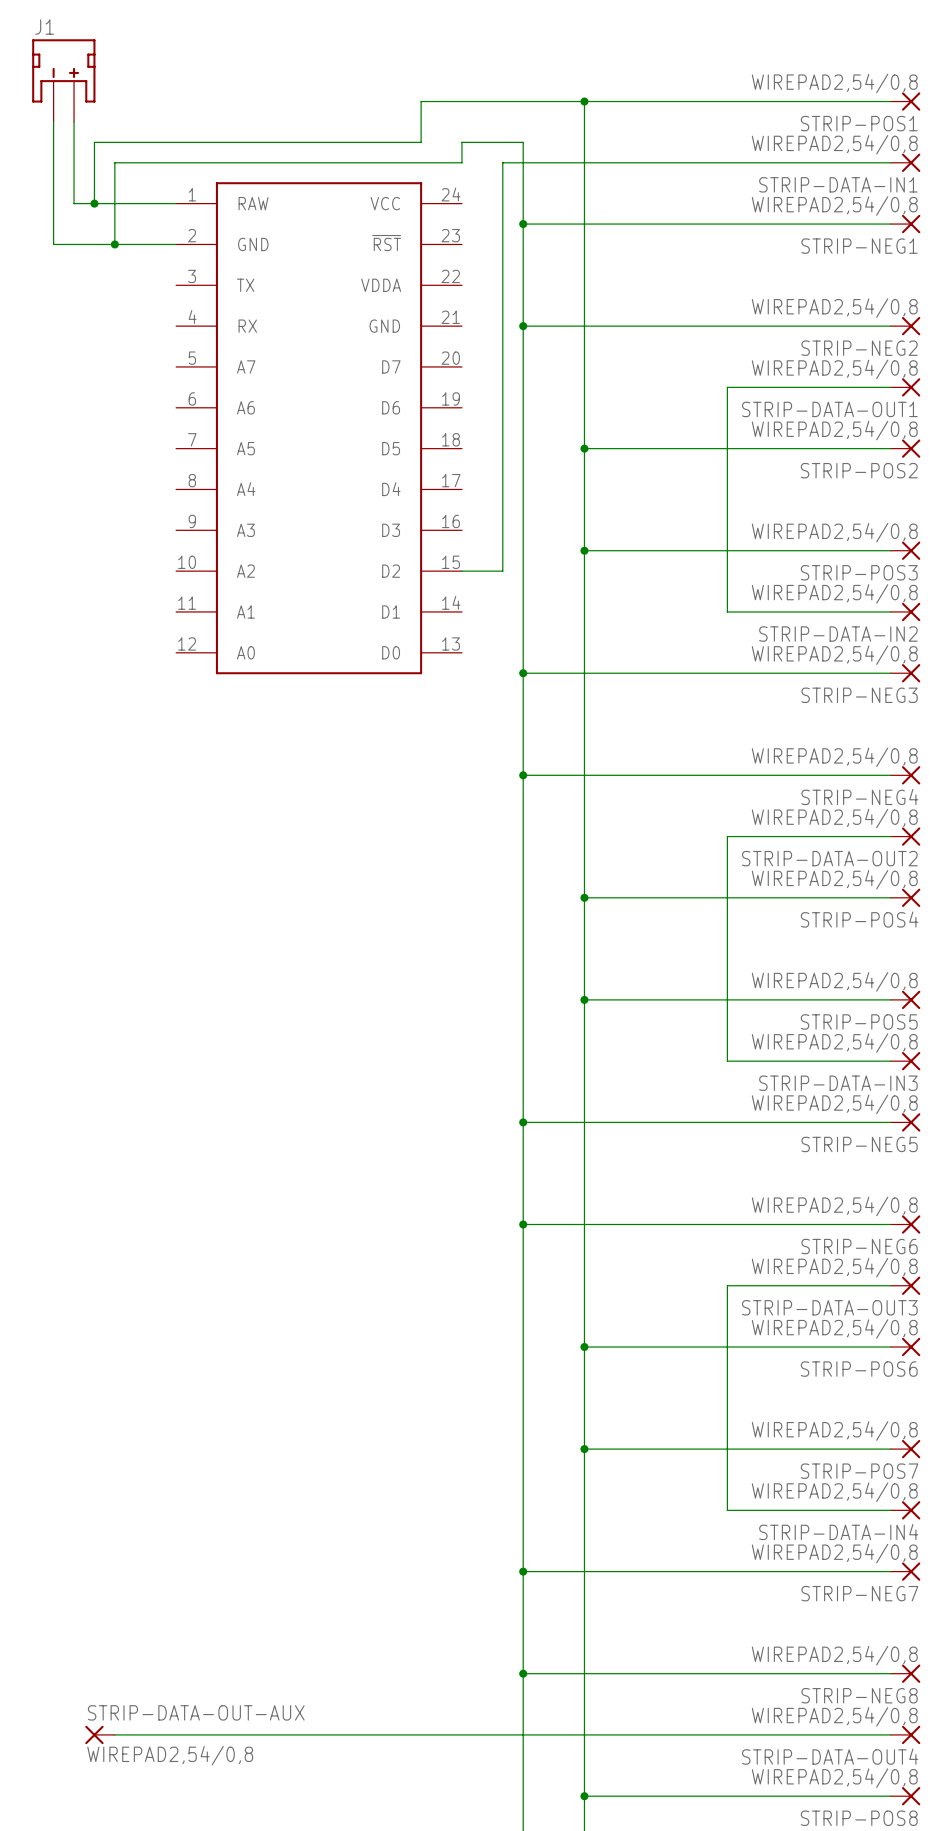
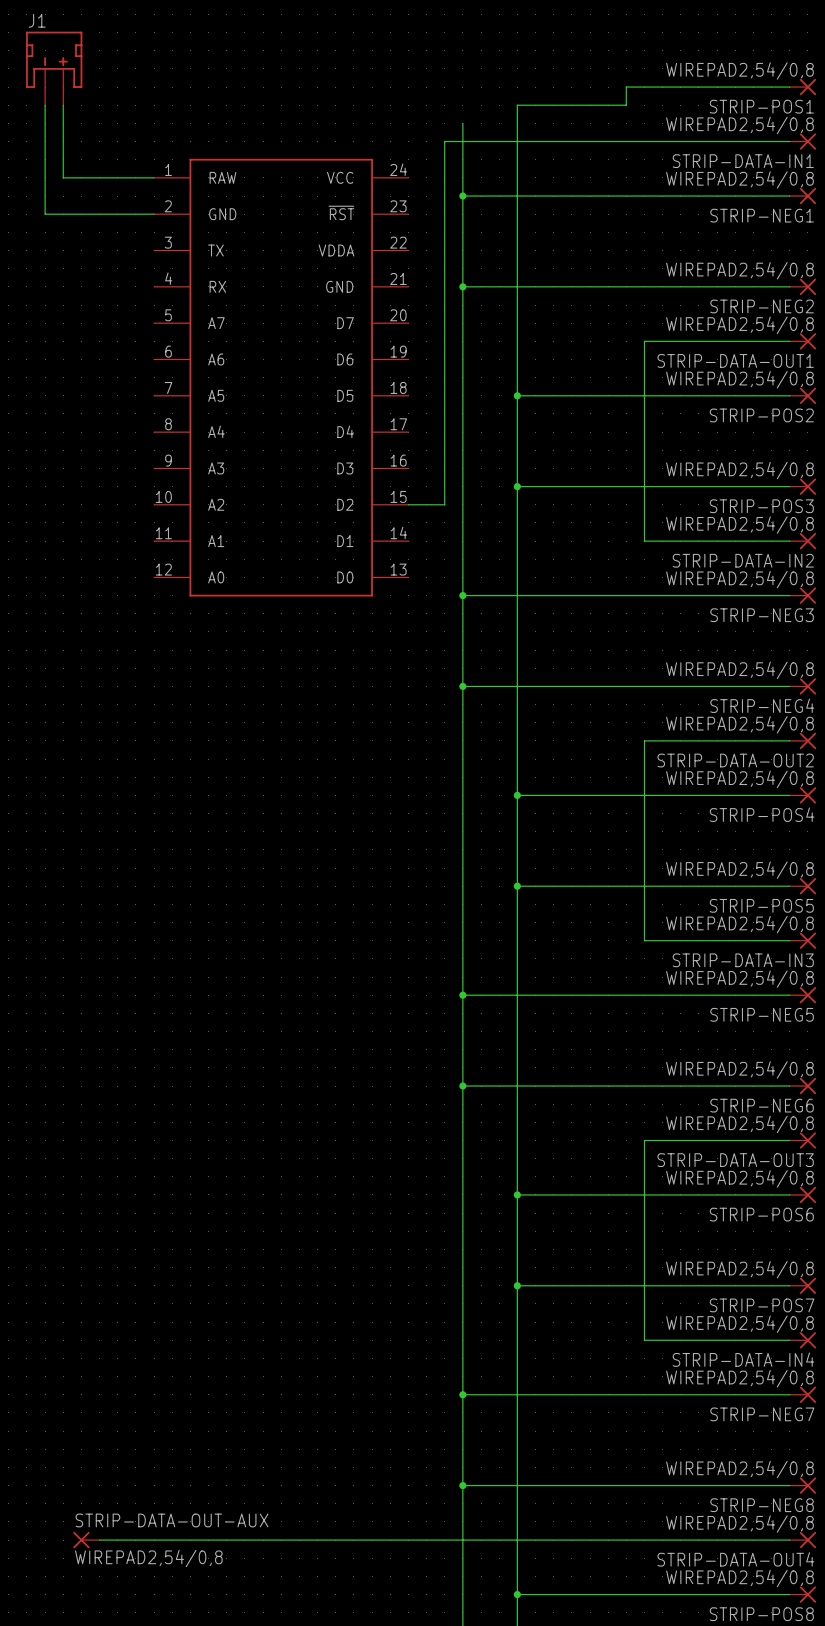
wire: (584, 101) (584, 121) -> (626, 87) (626, 105) (517, 105)
junction: (584, 101) -> none
wire: (706, 101) (421, 101) (421, 142) (94, 142) (94, 203) -> none
wire: (523, 142) (461, 142) (461, 162) (114, 162) (114, 244) -> none
junction: (94, 203) -> none
junction: (114, 244) -> none

